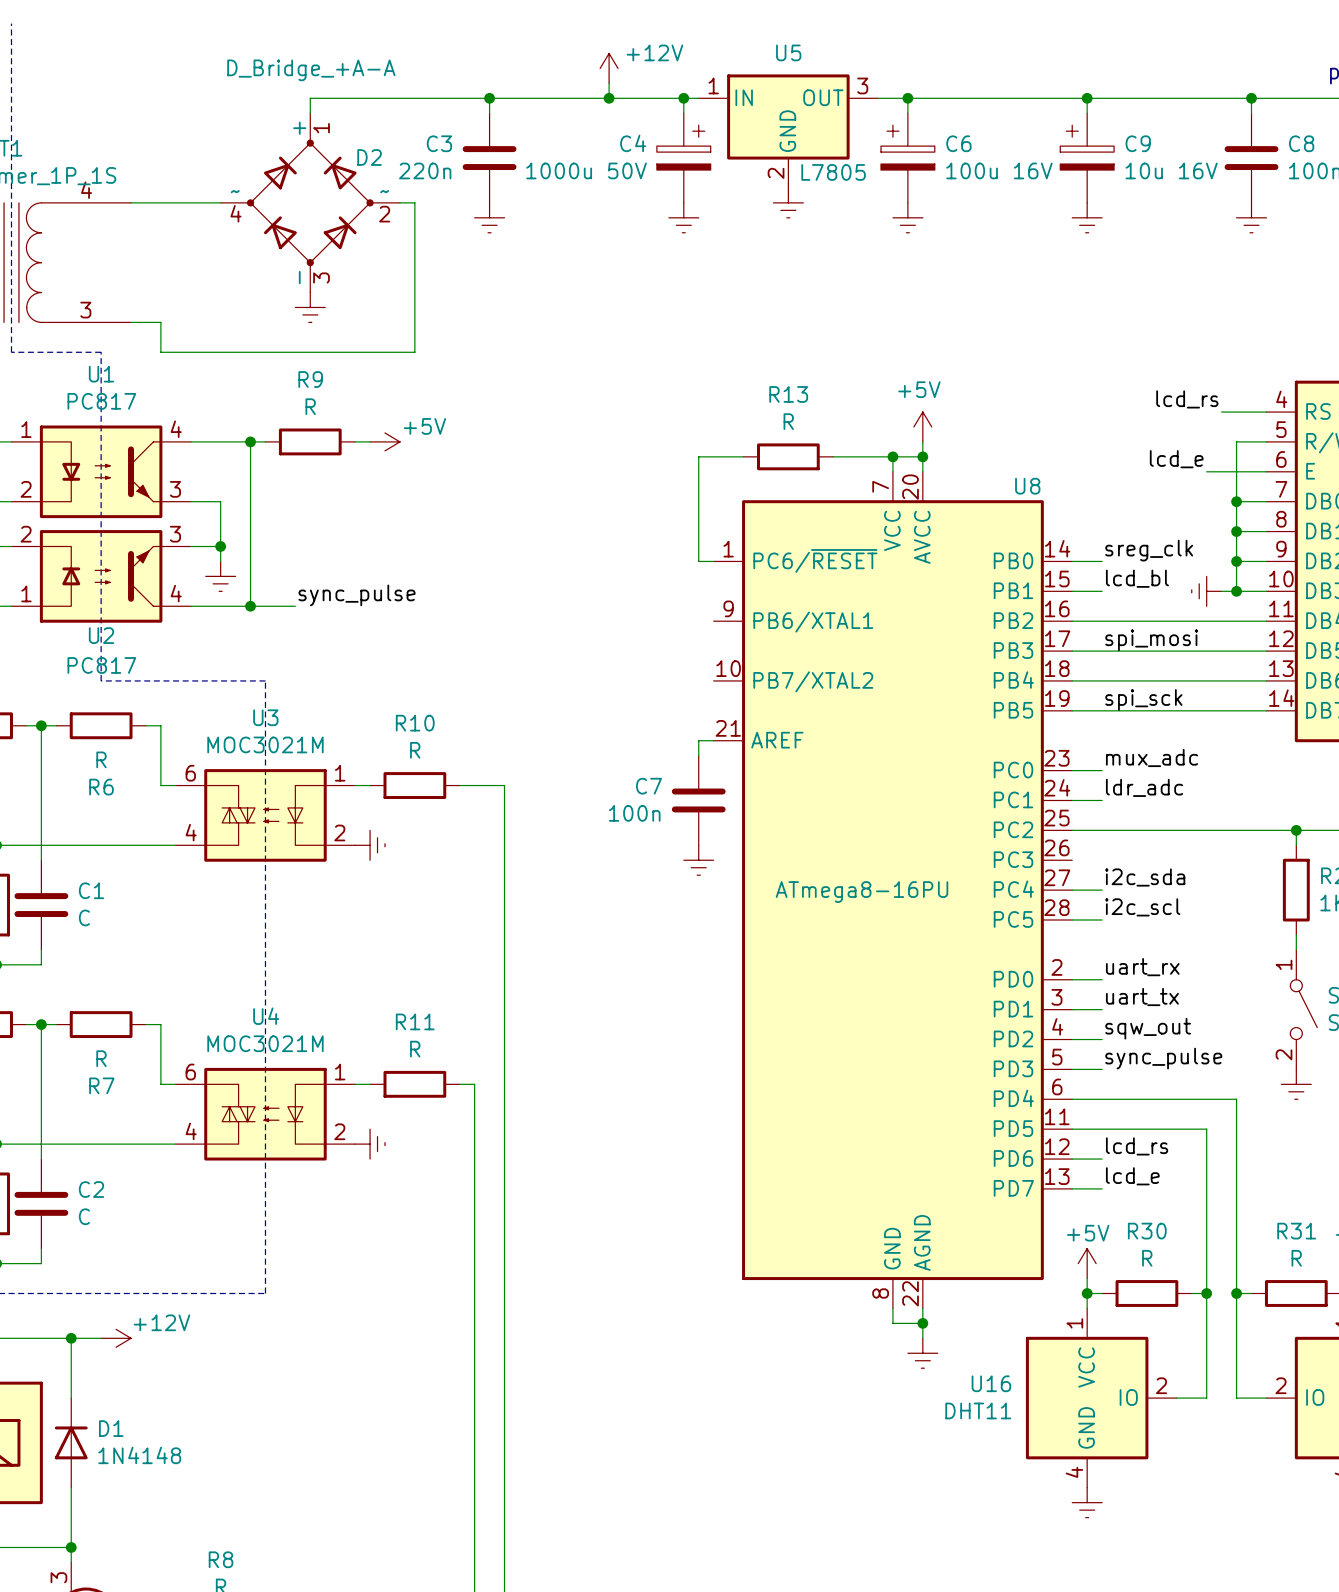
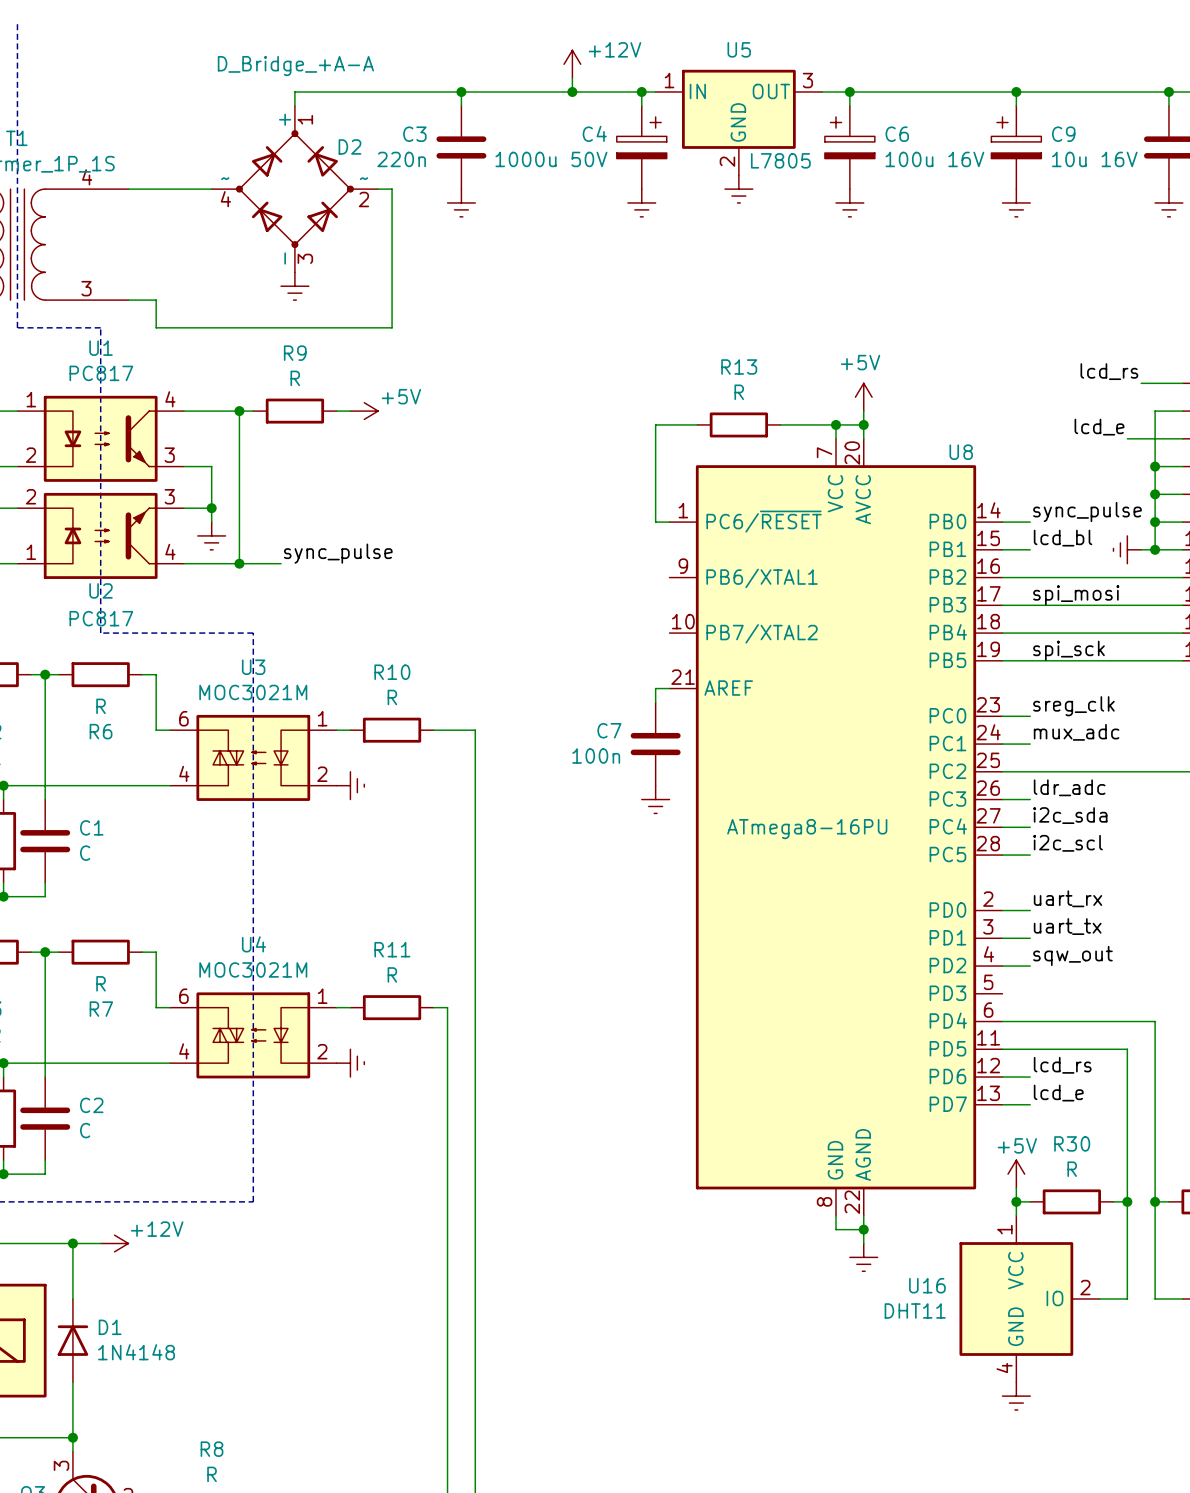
label: sreg_clk (1149, 550) -> sync_pulse (1087, 512)
label: mux_adc (1152, 757) -> sreg_clk (1073, 706)
label: ldr_adc (1144, 787) -> mux_adc (1076, 732)
label: none -> ldr_adc (1069, 787)
label: sync_pulse (1163, 1058) -> none
wire: (1072, 1069) (1102, 1069) -> (1002, 799) (1030, 799)

